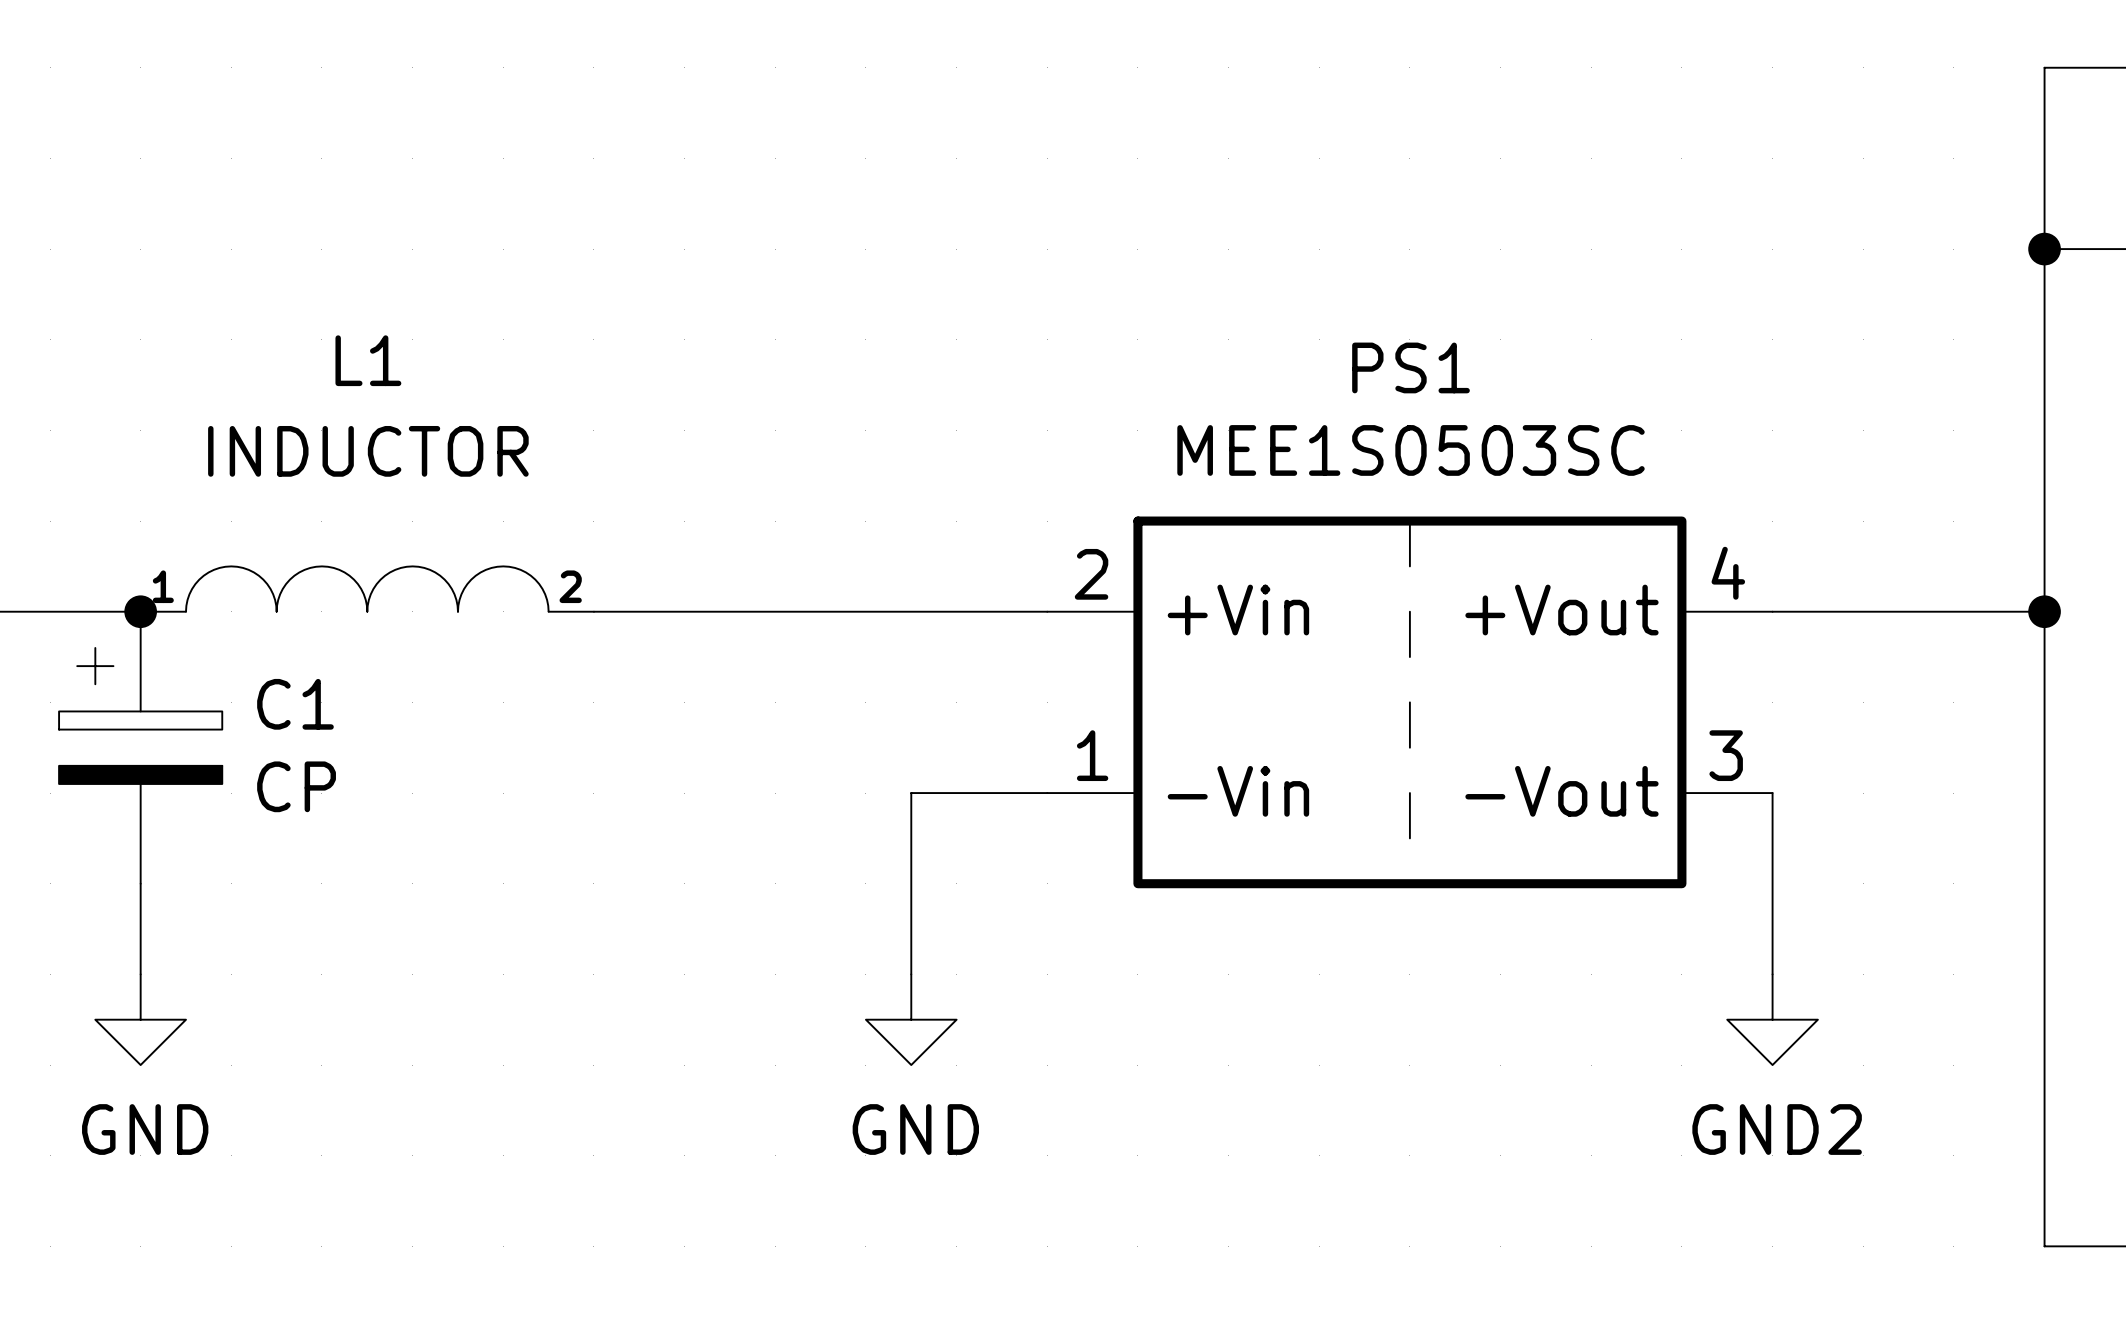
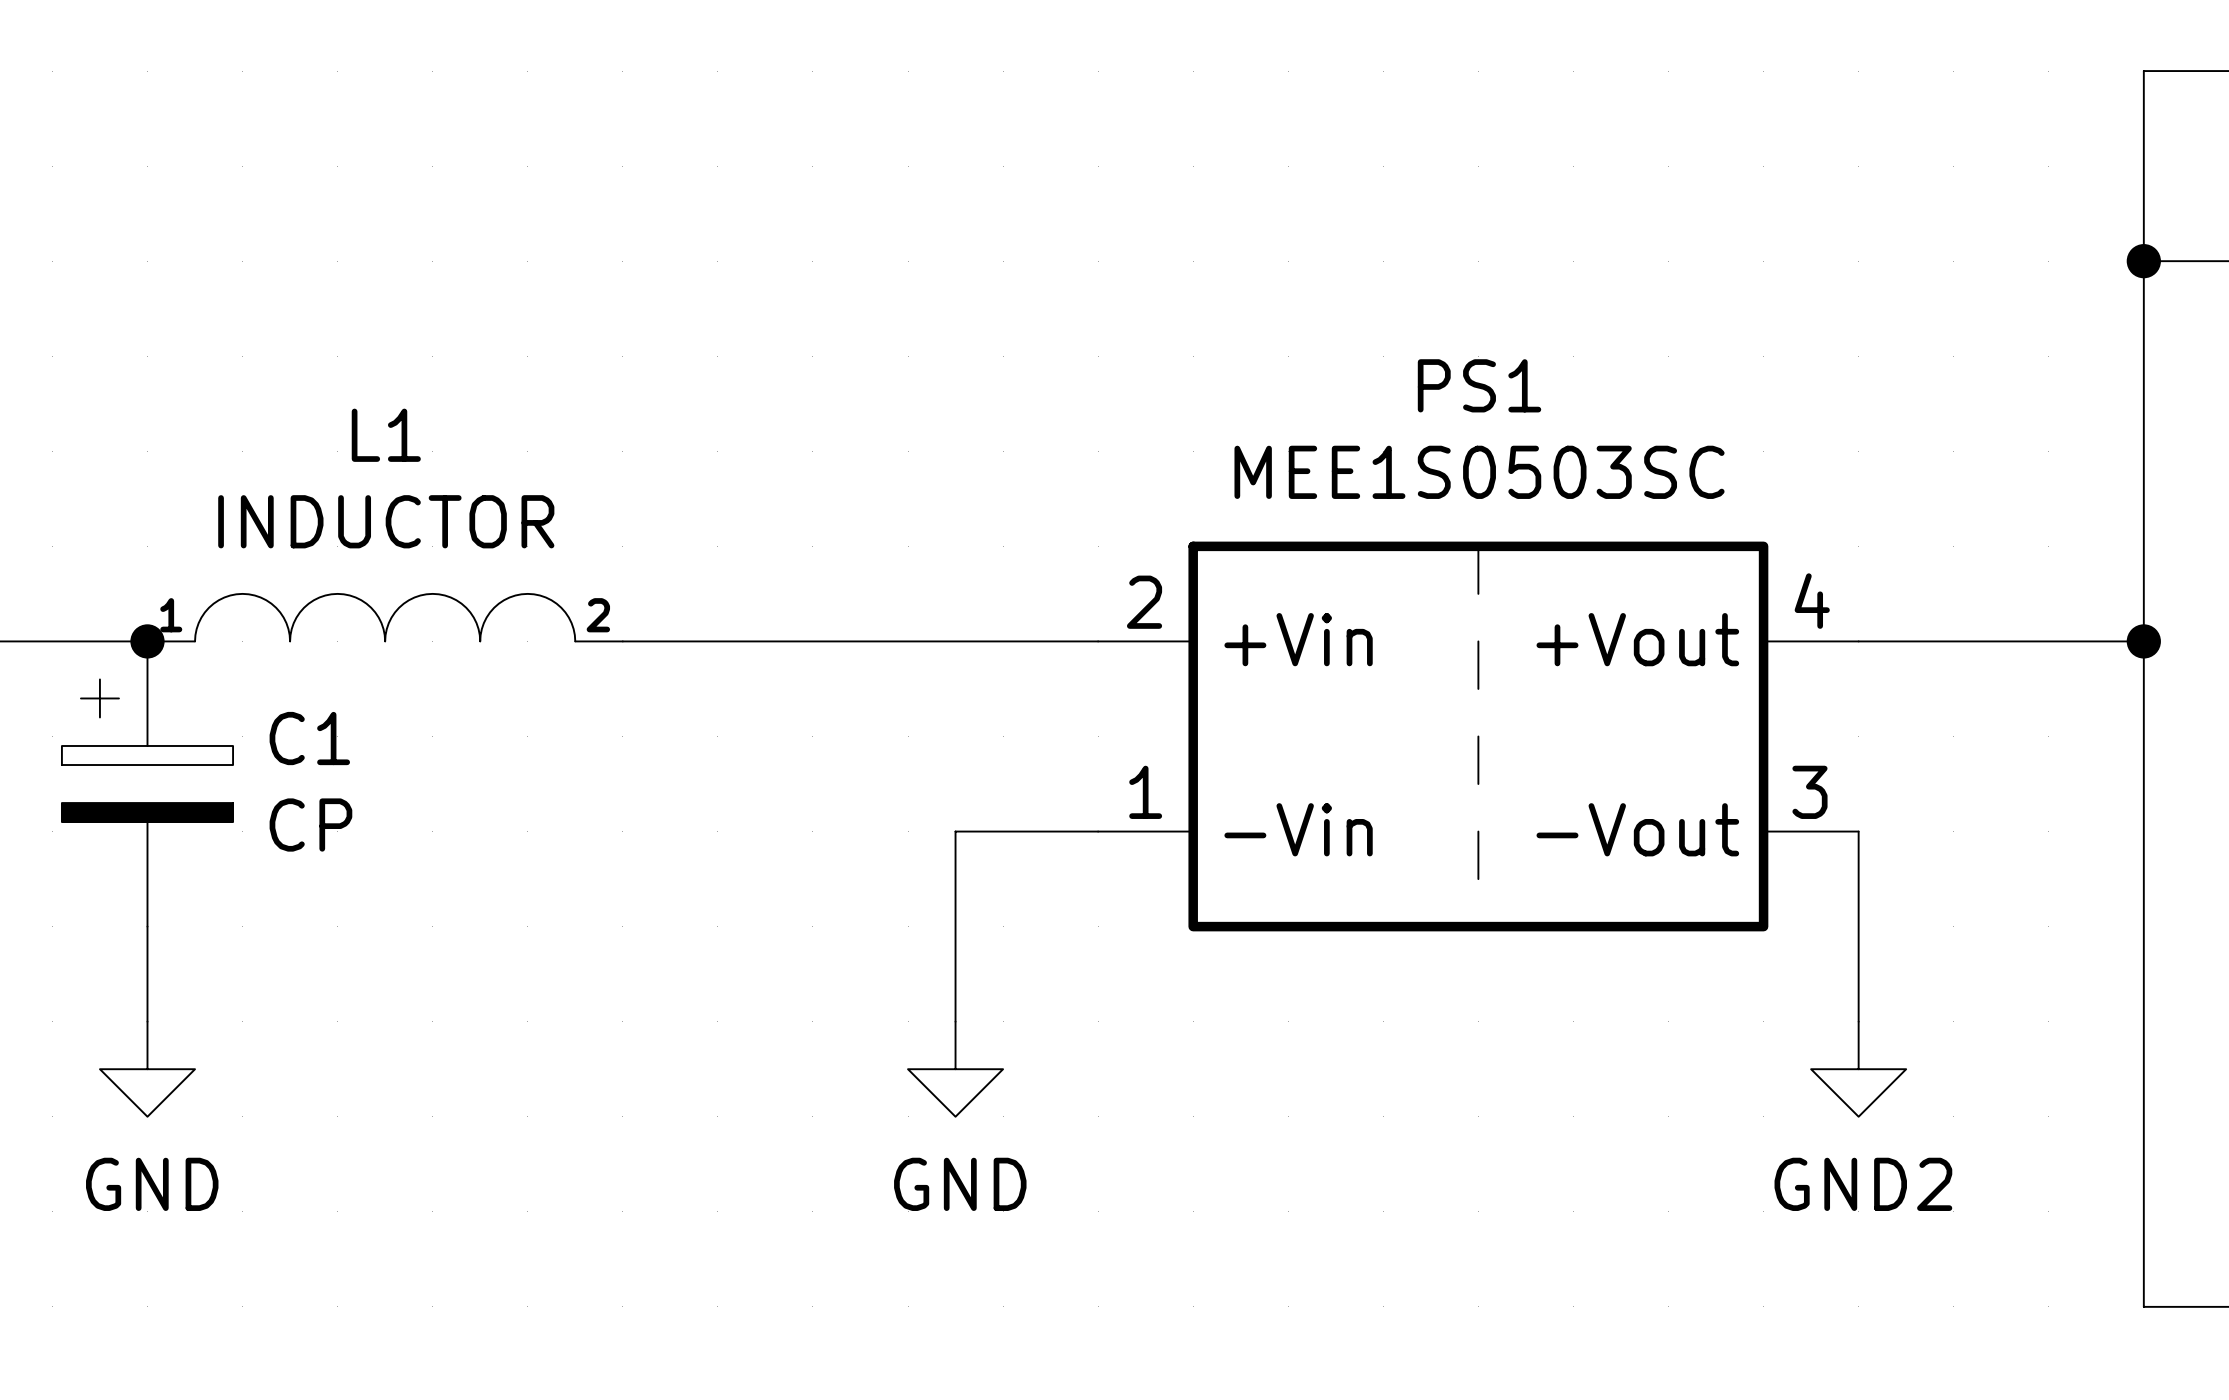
L1 name position: L1 (368, 360) -> L1 (386, 435)
L1 value position: INDUCTOR (368, 451) -> INDUCTOR (386, 521)

